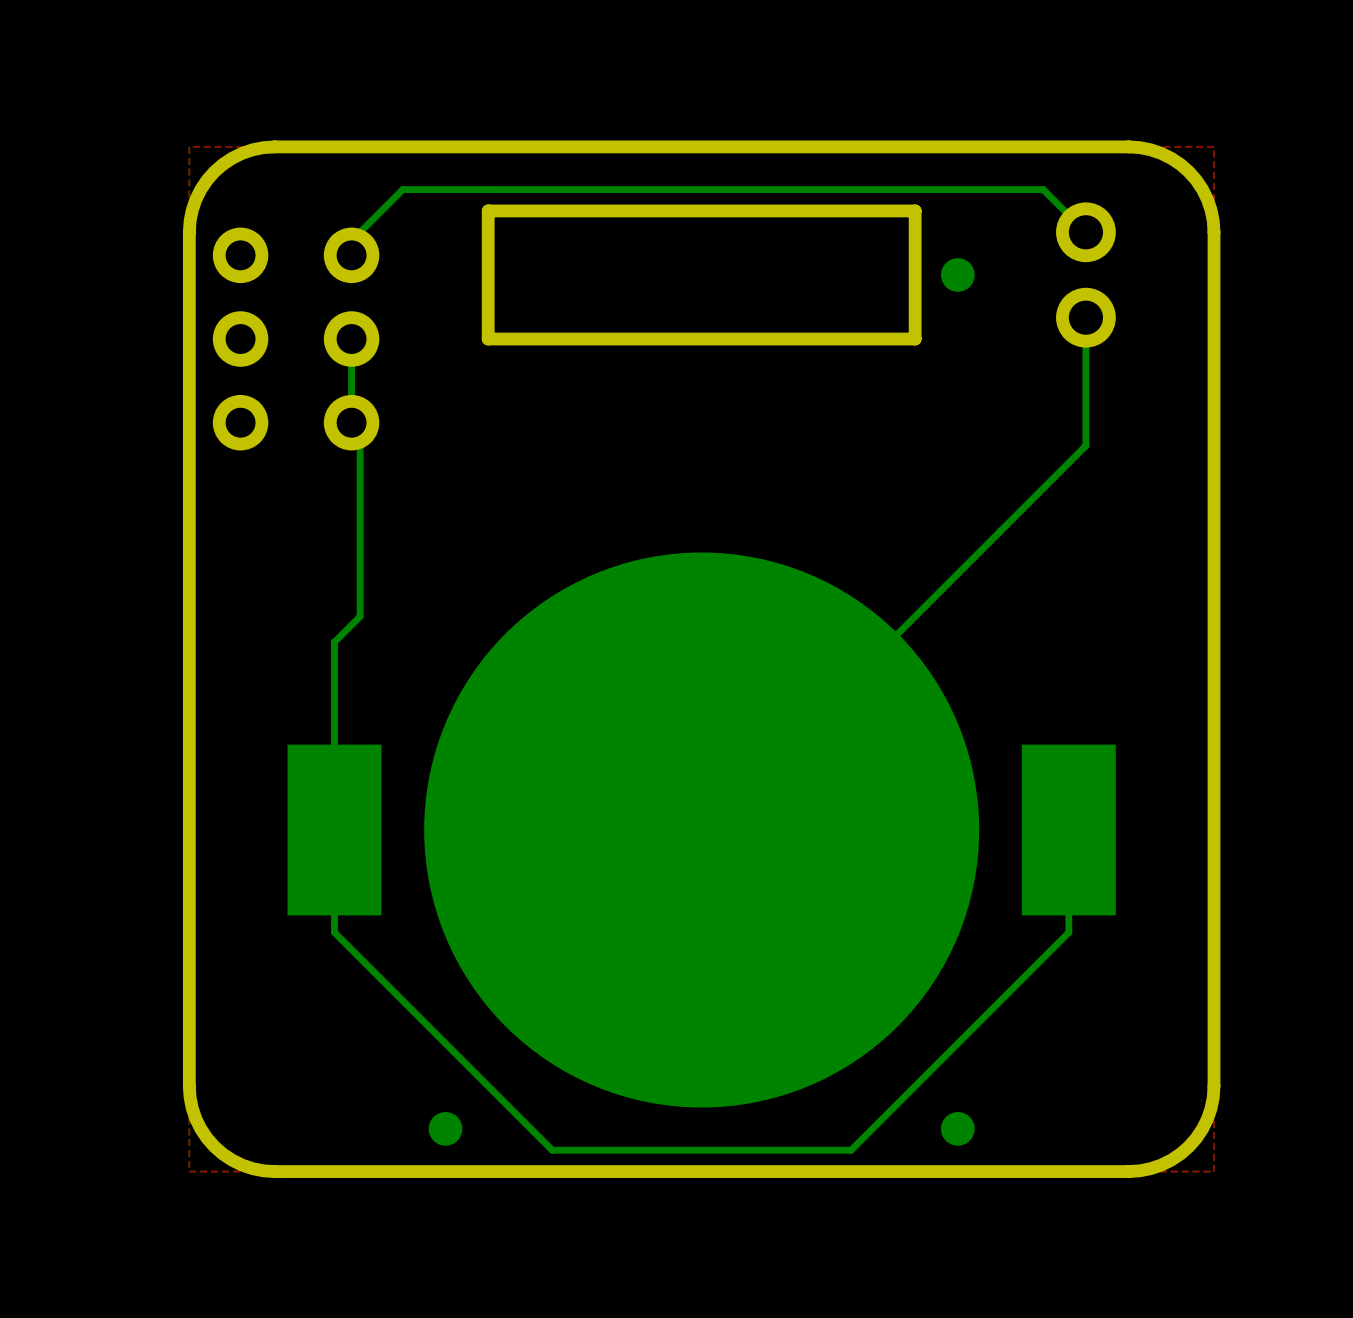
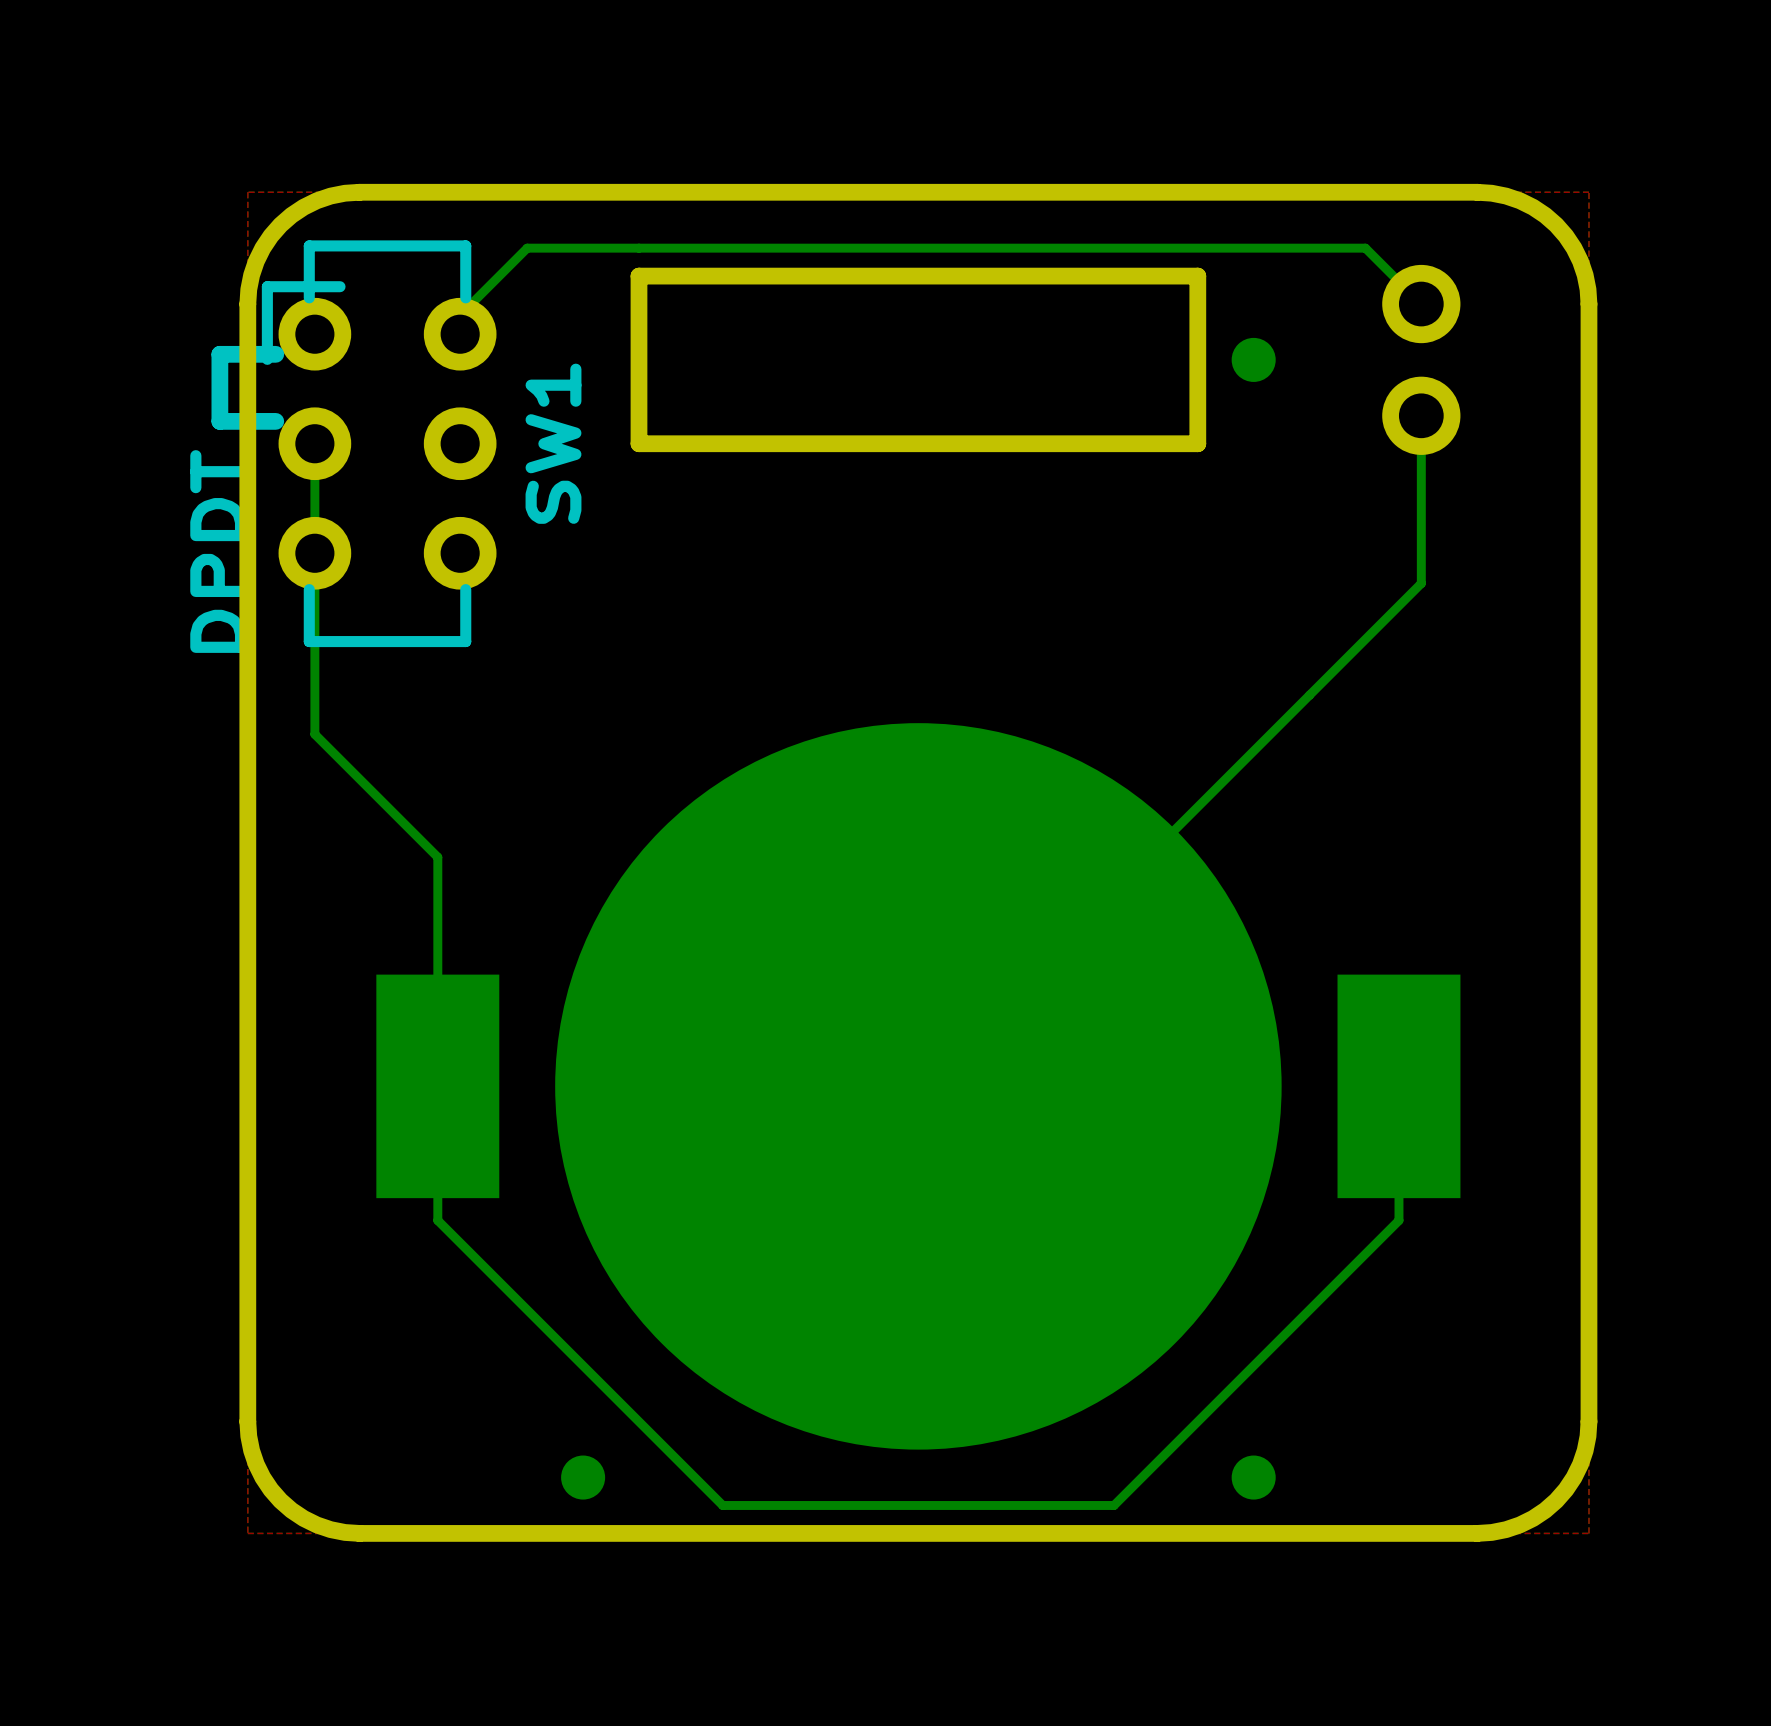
SW1 side: bottom (296, 339) -> top (353, 443)
bottom track: (351, 339) (351, 422) (360, 431) (360, 616) (334, 642) (334, 654) -> (314, 443) (314, 734) (437, 857)

